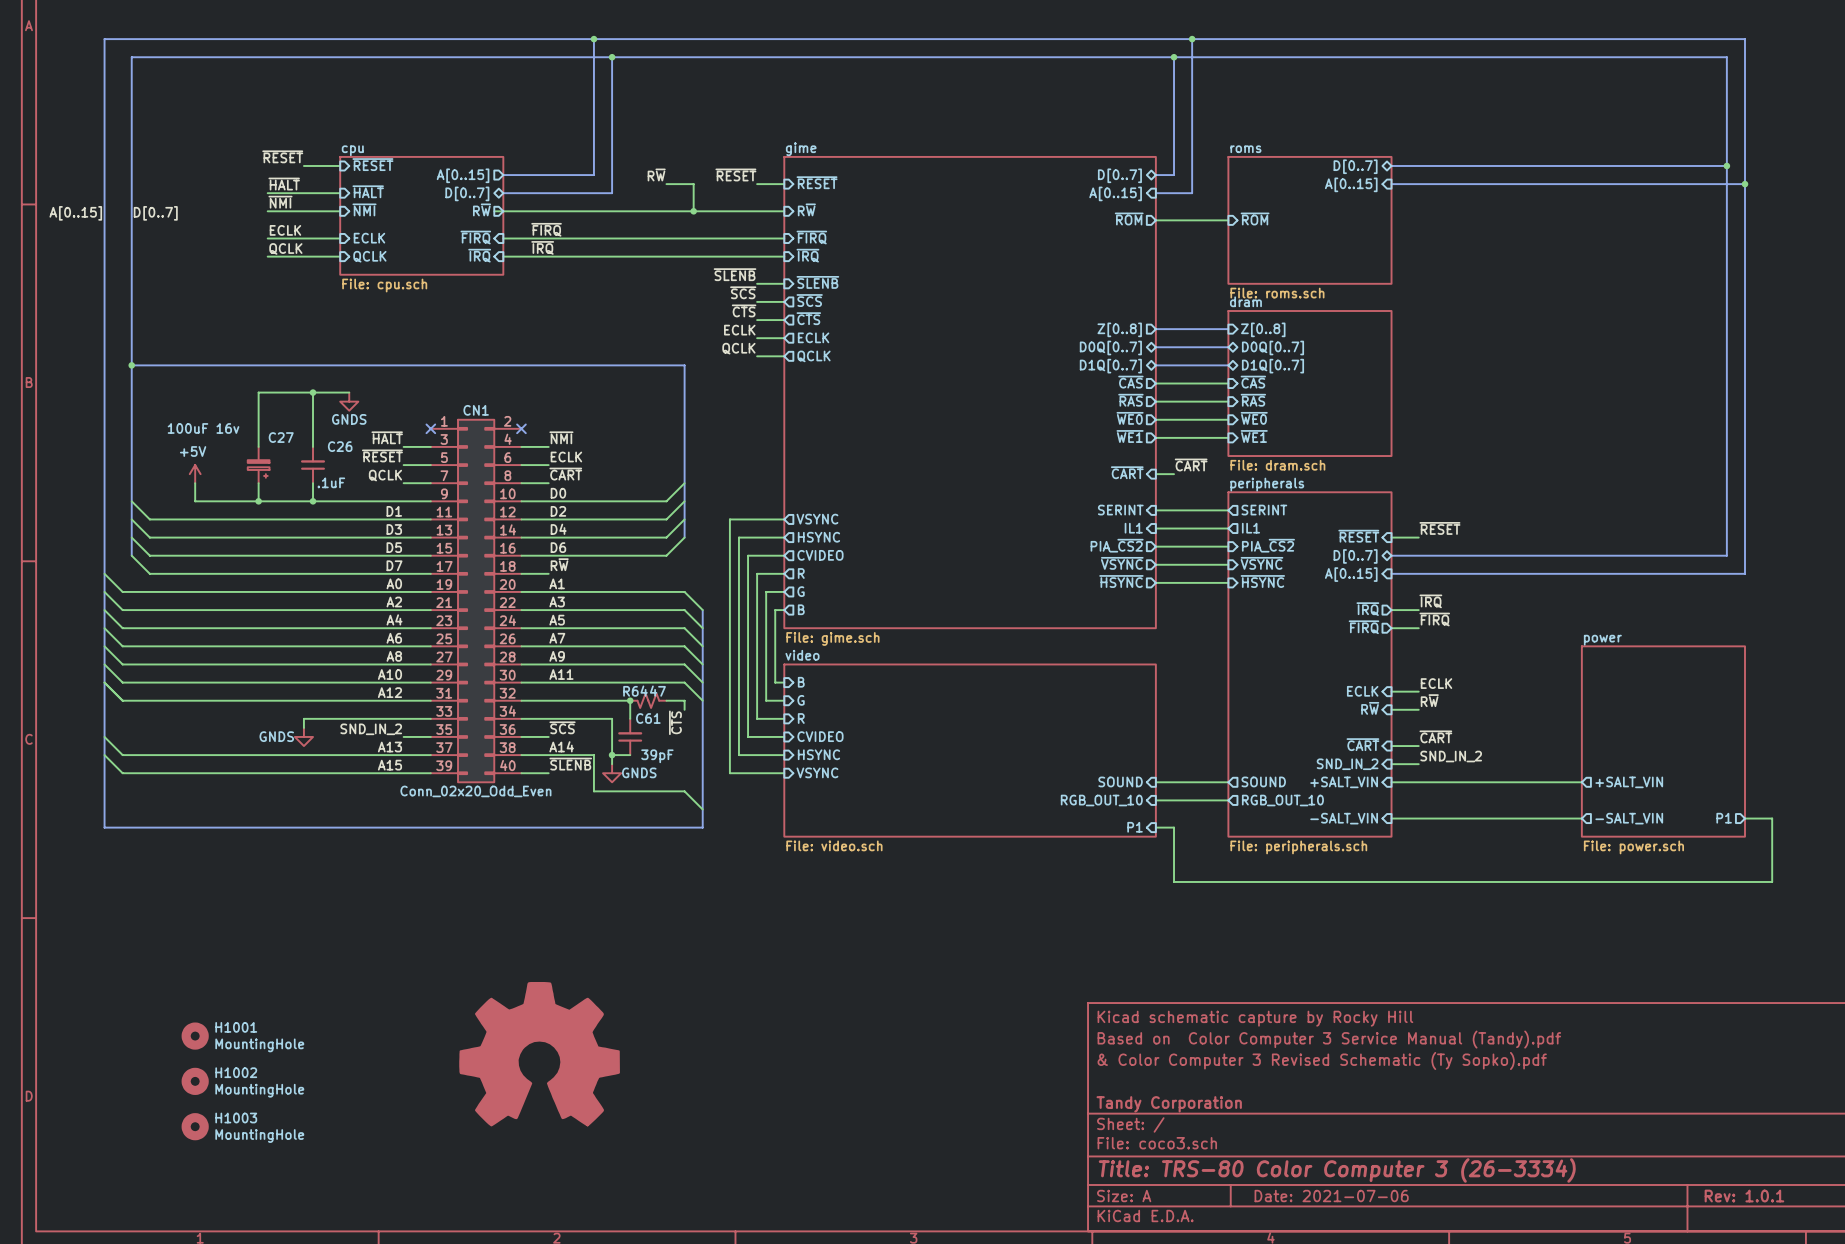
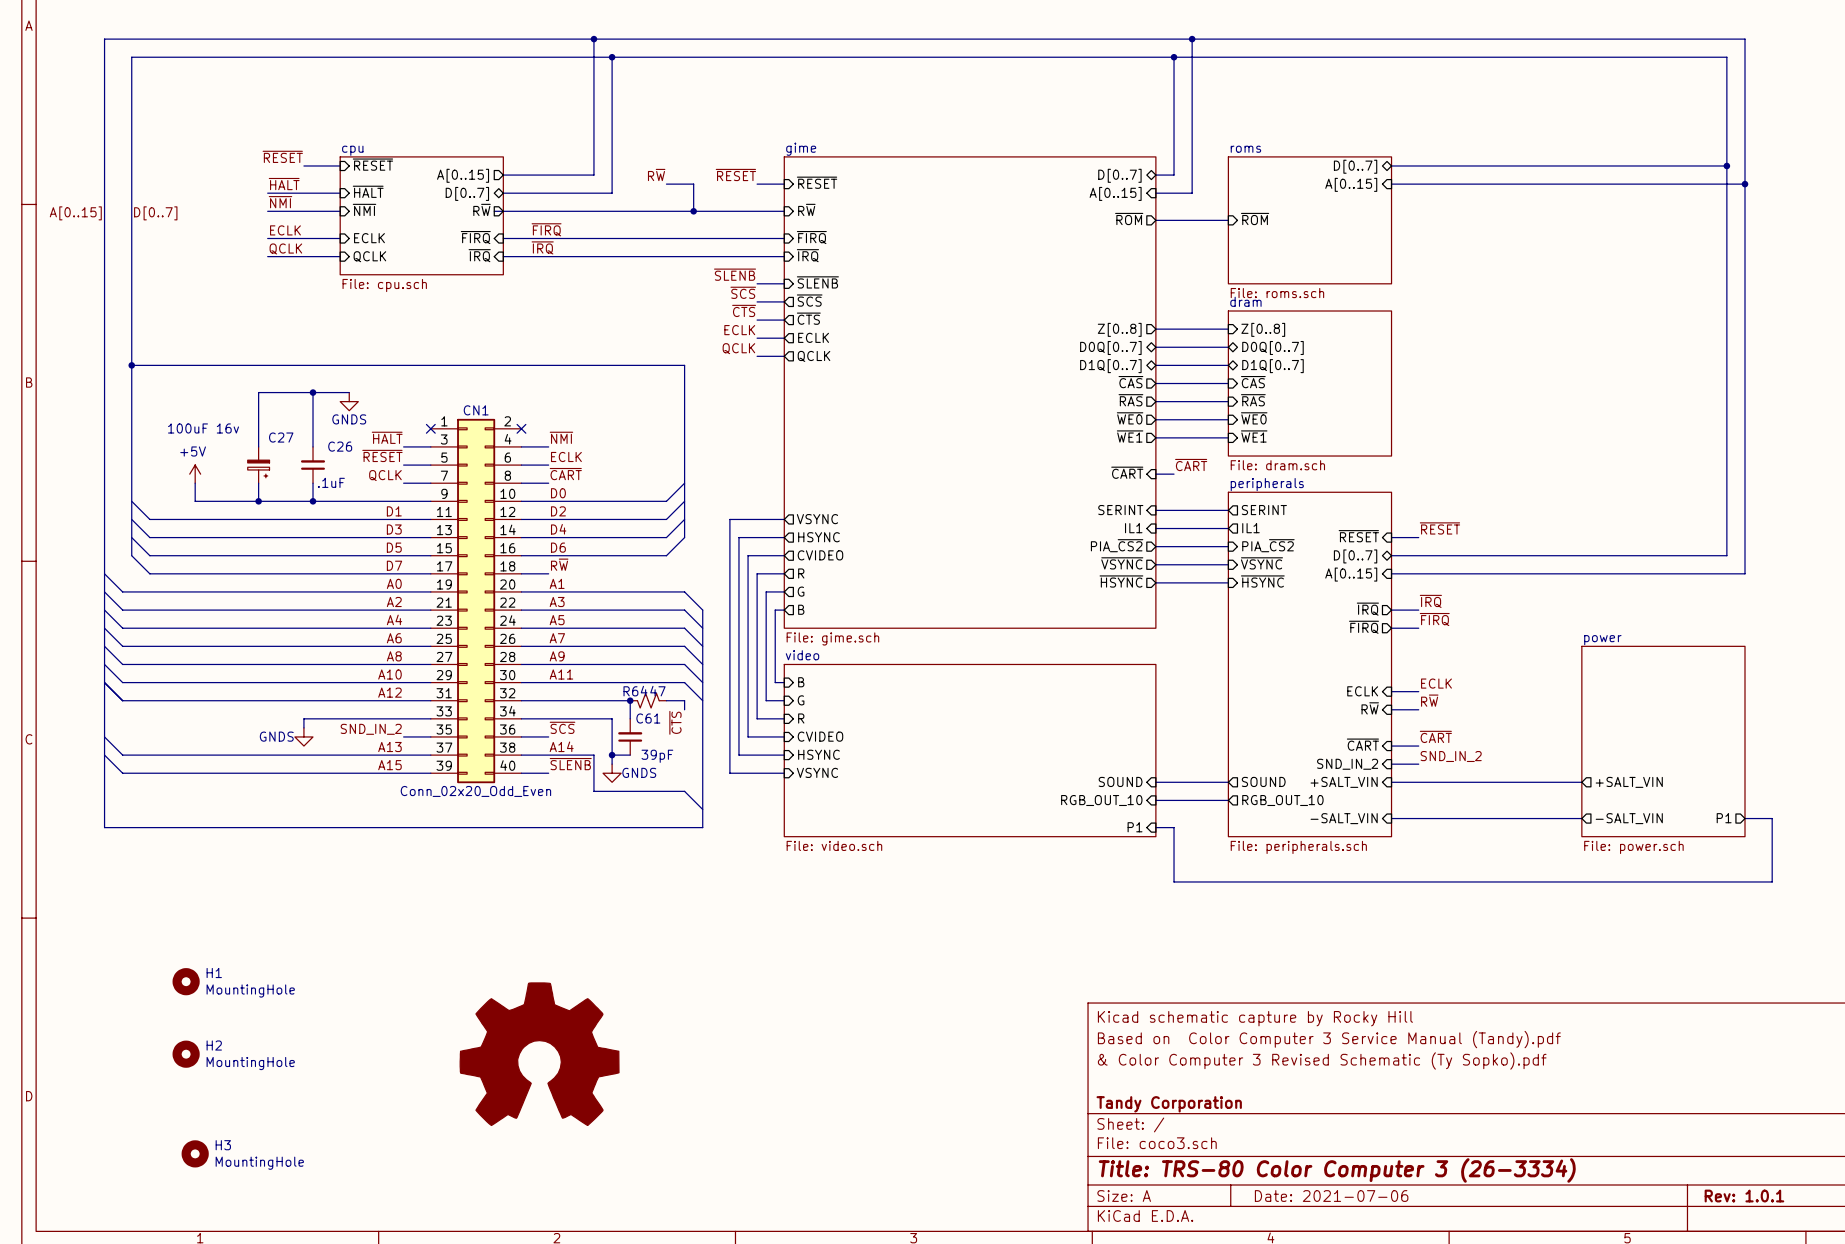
H1: none -> MountingHole (186, 981)
H1001: MountingHole (195, 1036) -> none
H2: none -> MountingHole (186, 1054)
H1002: MountingHole (195, 1081) -> none
H1003: MountingHole (195, 1126) -> none
H3: none -> MountingHole (195, 1153)

